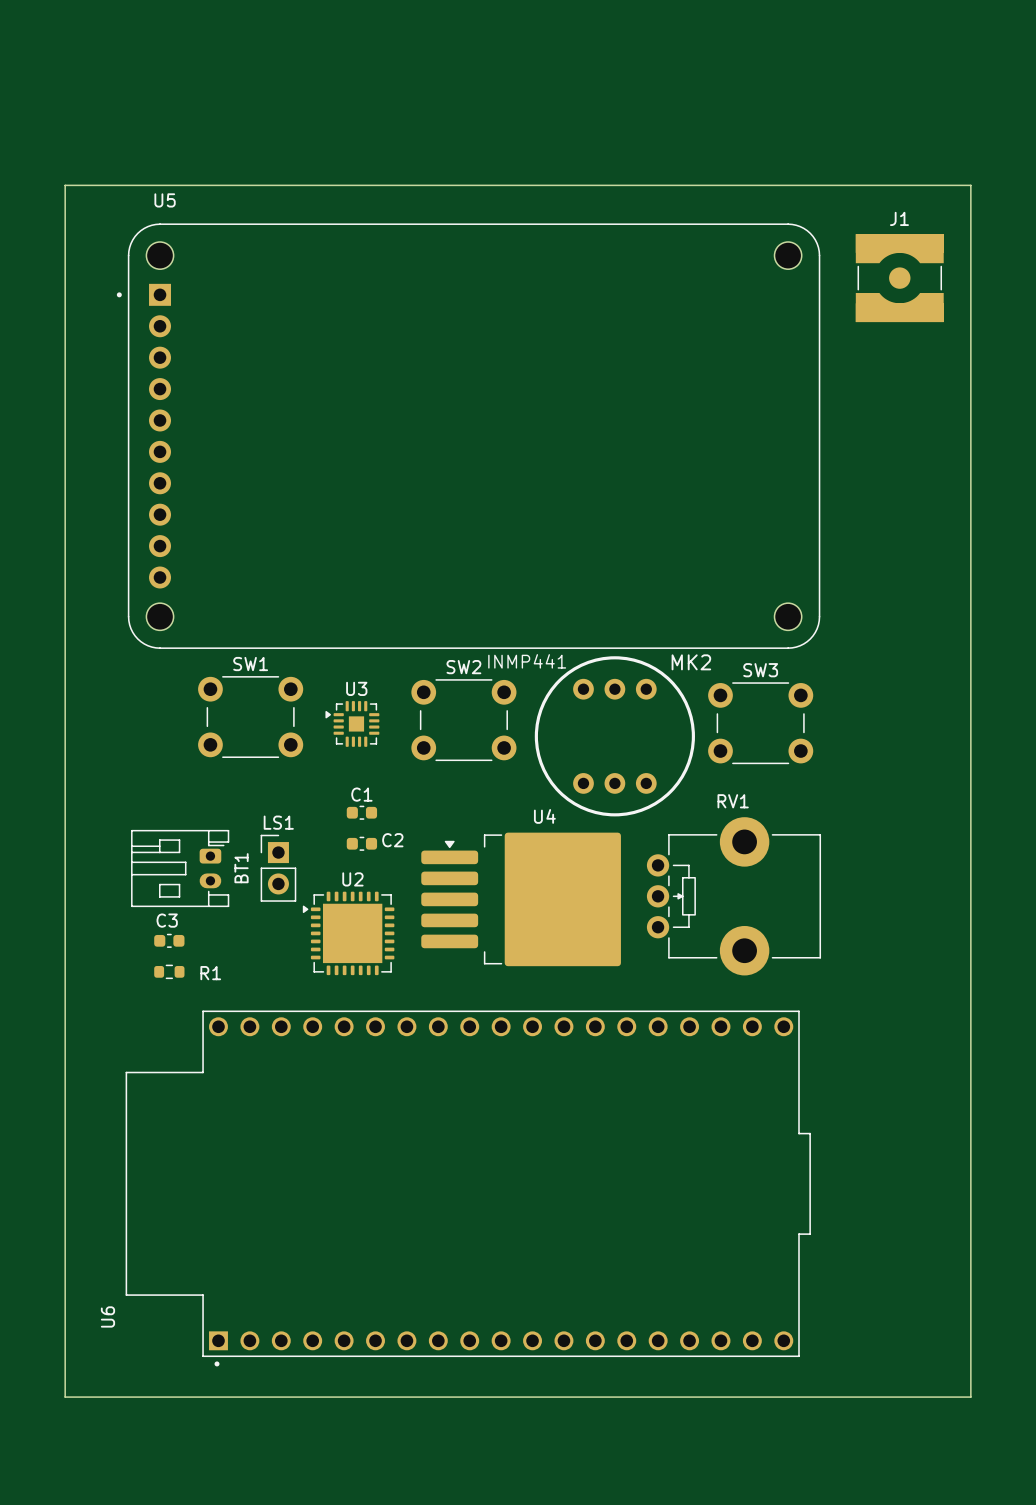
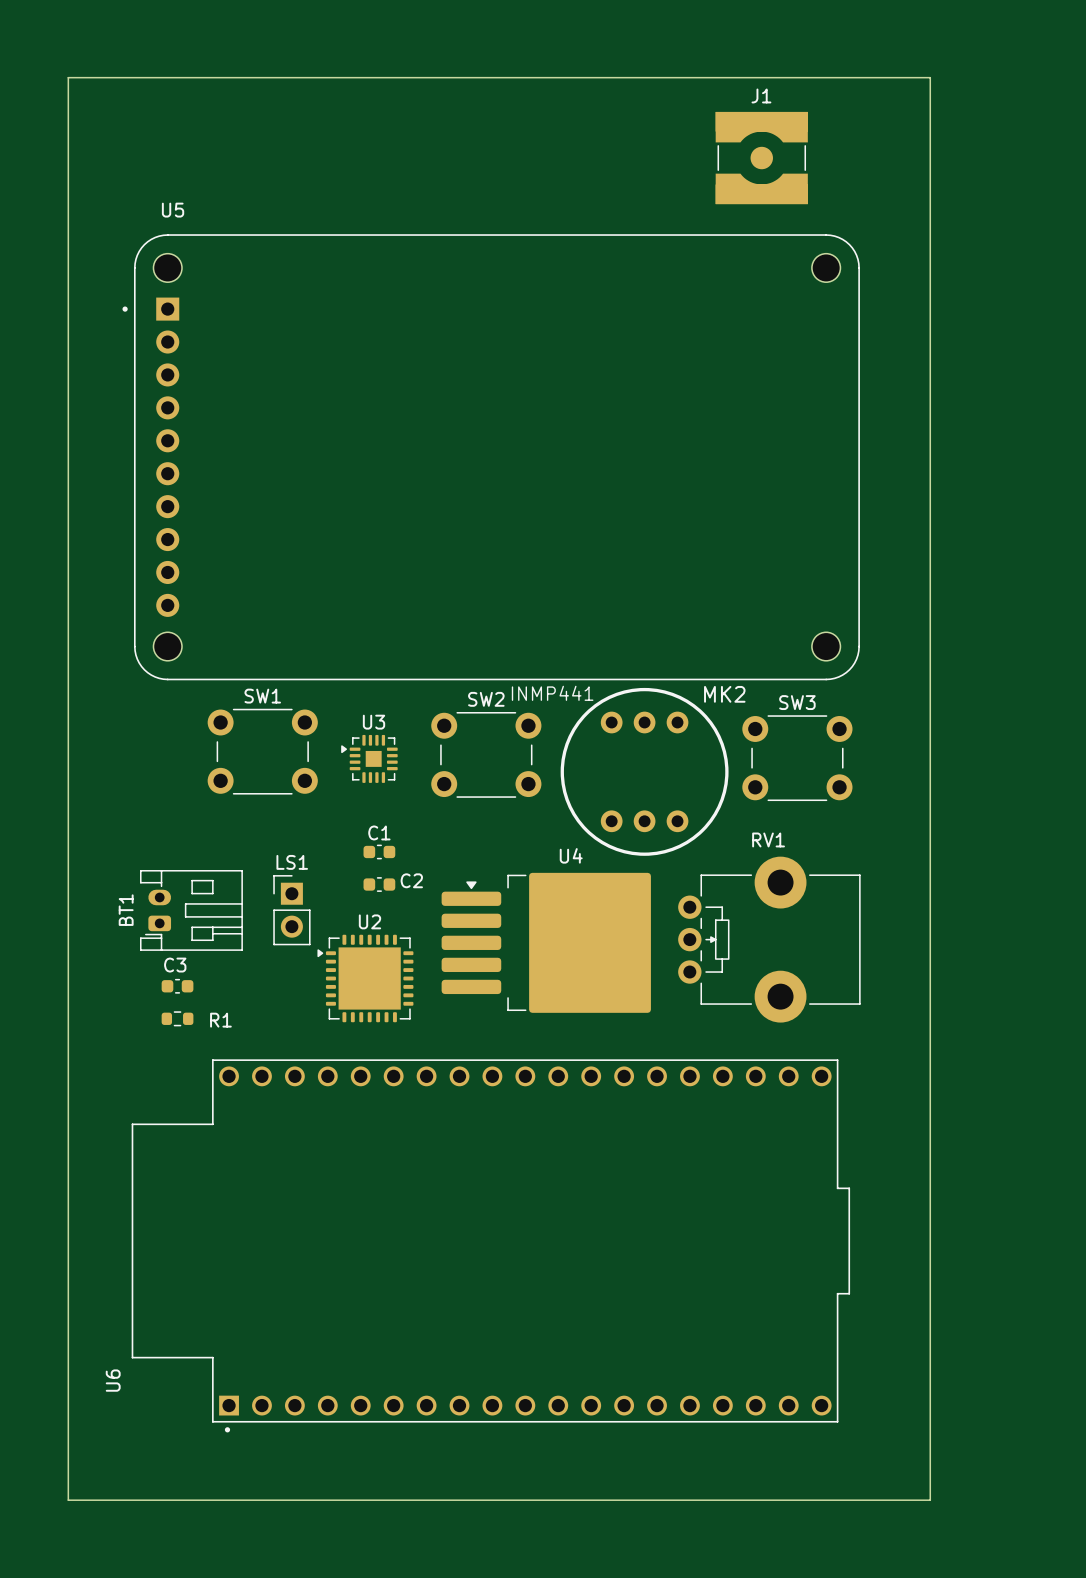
board edge: (65, 185) (970, 185) (970, 1397) (65, 1397) -> (68, 194) (68, 77) (930, 77) (930, 1500) (68, 1500) (68, 1464)
J1 position: (899, 278) -> (761, 158)
BT1 rotation: 0° (180, 868) -> 180° (191, 910)

